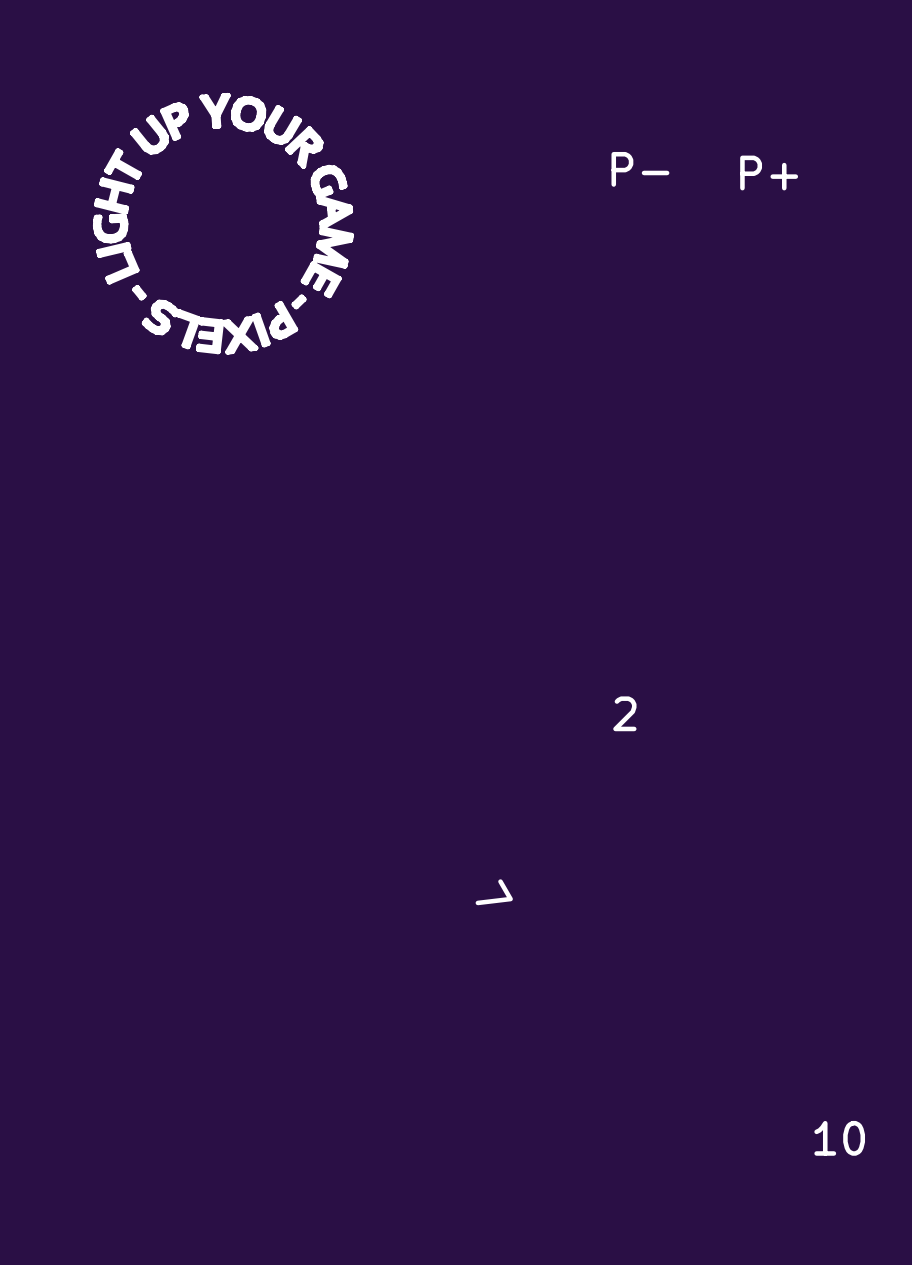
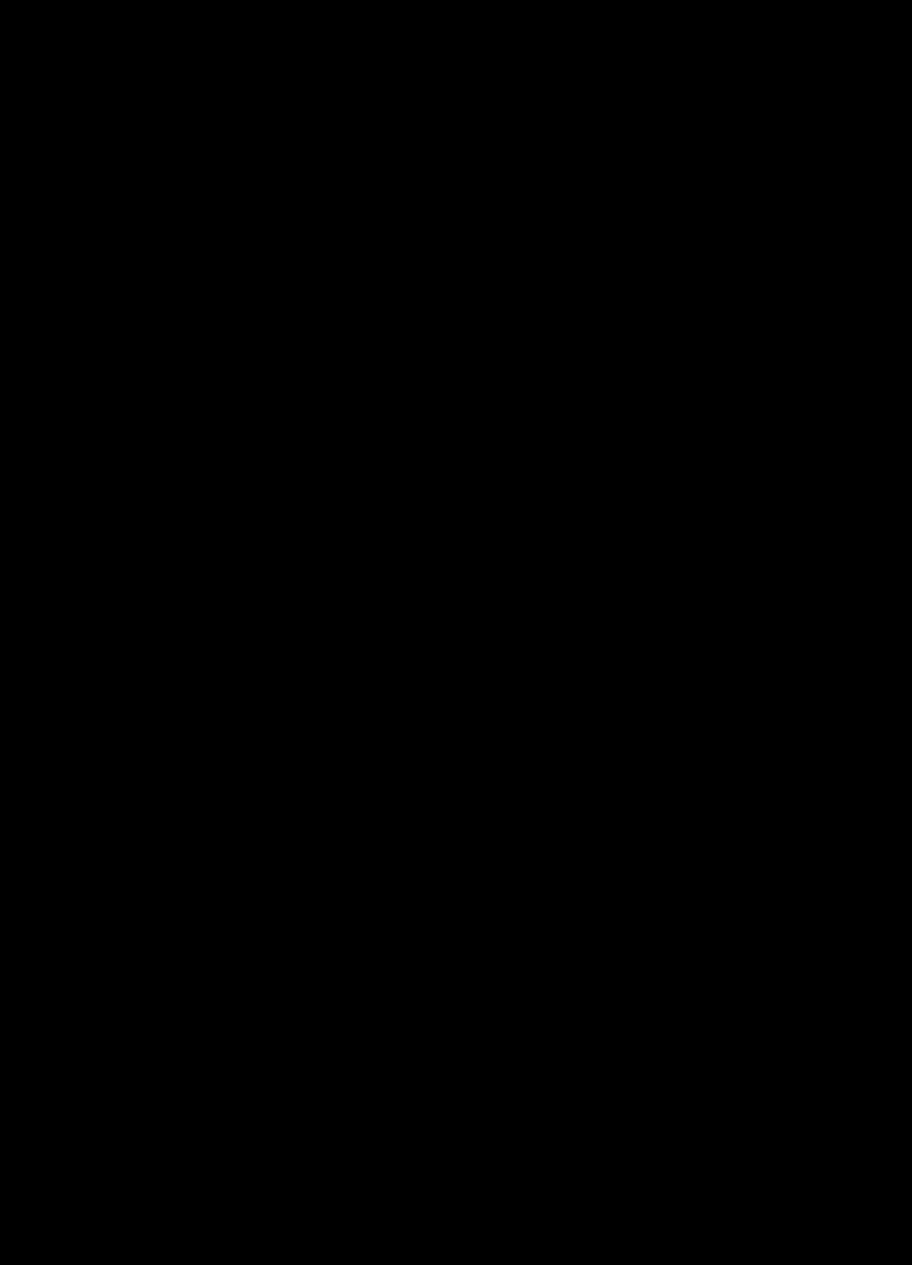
line: (228, 95) (217, 115) (218, 126) (214, 126) (214, 115) (202, 97) (206, 96) (215, 111) (223, 95) (228, 95) -> none
line: (250, 98) (239, 100) (233, 112) (235, 123) (247, 128) (257, 127) (263, 115) (261, 104) (250, 98) -> none
line: (251, 102) (257, 105) (259, 116) (256, 123) (251, 125) (246, 125) (239, 121) (238, 111) (241, 104) (246, 101) (251, 102) -> none
line: (178, 104) (162, 110) (174, 138) (178, 136) (167, 112) (177, 108) (181, 111) (180, 118) (176, 121) (178, 124) (186, 114) (183, 106) (178, 104) -> none
line: (278, 107) (281, 109) (270, 130) (274, 137) (280, 138) (284, 136) (296, 118) (299, 120) (290, 136) (281, 142) (273, 139) (266, 131) (267, 125) (278, 107) -> none
line: (151, 117) (163, 131) (166, 142) (161, 148) (151, 152) (146, 149) (132, 133) (135, 130) (151, 148) (159, 146) (162, 141) (162, 136) (148, 119) (151, 117) -> none
line: (309, 128) (287, 149) (290, 152) (309, 133) (316, 141) (315, 146) (309, 147) (305, 144) (303, 146) (300, 162) (303, 166) (306, 149) (313, 151) (318, 149) (320, 142) (309, 128) -> none
line: (117, 150) (106, 170) (109, 172) (114, 164) (137, 177) (139, 173) (116, 160) (120, 152) (117, 150) -> none
line: (328, 167) (338, 171) (344, 185) (341, 187) (340, 179) (332, 171) (324, 172) (316, 179) (316, 185) (319, 192) (329, 188) (330, 191) (319, 196) (315, 189) (313, 179) (319, 170) (328, 167) -> none
text: P- (640, 169) -> none
text: P+ (769, 173) -> none
line: (102, 179) (101, 183) (114, 186) (110, 204) (97, 200) (96, 204) (125, 211) (126, 208) (113, 204) (117, 187) (130, 191) (131, 187) (102, 179) -> none
line: (318, 197) (350, 207) (350, 211) (322, 227) (321, 223) (330, 218) (329, 208) (332, 209) (333, 216) (346, 209) (319, 201) (318, 197) -> none
line: (124, 216) (111, 216) (111, 220) (121, 220) (122, 227) (120, 232) (110, 236) (102, 234) (98, 225) (99, 217) (96, 217) (95, 227) (100, 237) (110, 240) (119, 238) (125, 229) (124, 216) -> none
line: (322, 229) (321, 232) (345, 237) (319, 243) (318, 246) (340, 261) (316, 256) (315, 259) (344, 266) (345, 261) (323, 245) (350, 240) (351, 235) (322, 229) -> none
line: (127, 244) (98, 251) (99, 255) (128, 248) (127, 244) -> none
line: (129, 252) (126, 253) (132, 267) (107, 278) (109, 281) (136, 270) (129, 252) -> none
line: (313, 263) (303, 281) (306, 282) (313, 268) (323, 273) (315, 286) (318, 288) (325, 275) (334, 280) (326, 294) (329, 295) (339, 278) (313, 263) -> none
line: (137, 287) (143, 295) (141, 297) (134, 289) (137, 287) -> none
line: (301, 297) (294, 304) (296, 306) (303, 299) (301, 297) -> none
line: (159, 302) (169, 305) (177, 311) (175, 314) (162, 305) (158, 308) (158, 313) (167, 321) (167, 326) (162, 332) (156, 332) (144, 323) (146, 320) (158, 329) (163, 327) (163, 321) (154, 314) (153, 308) (159, 302) -> none
line: (280, 303) (277, 305) (290, 328) (281, 333) (276, 331) (277, 324) (281, 320) (278, 317) (271, 327) (275, 335) (280, 337) (295, 329) (280, 303) -> none
line: (179, 311) (178, 314) (193, 320) (184, 345) (187, 346) (197, 318) (179, 311) -> none
line: (257, 315) (267, 343) (264, 344) (254, 316) (257, 315) -> none
line: (251, 318) (242, 334) (255, 348) (251, 348) (240, 338) (232, 351) (227, 352) (237, 335) (223, 322) (228, 321) (239, 332) (246, 319) (251, 318) -> none
line: (201, 319) (201, 322) (217, 324) (216, 335) (201, 333) (200, 336) (215, 338) (214, 348) (199, 346) (198, 349) (218, 351) (221, 321) (201, 319) -> none
text: 2 (624, 713) -> none
text: 7 (494, 892) -> none
text: 10 (839, 1138) -> none

